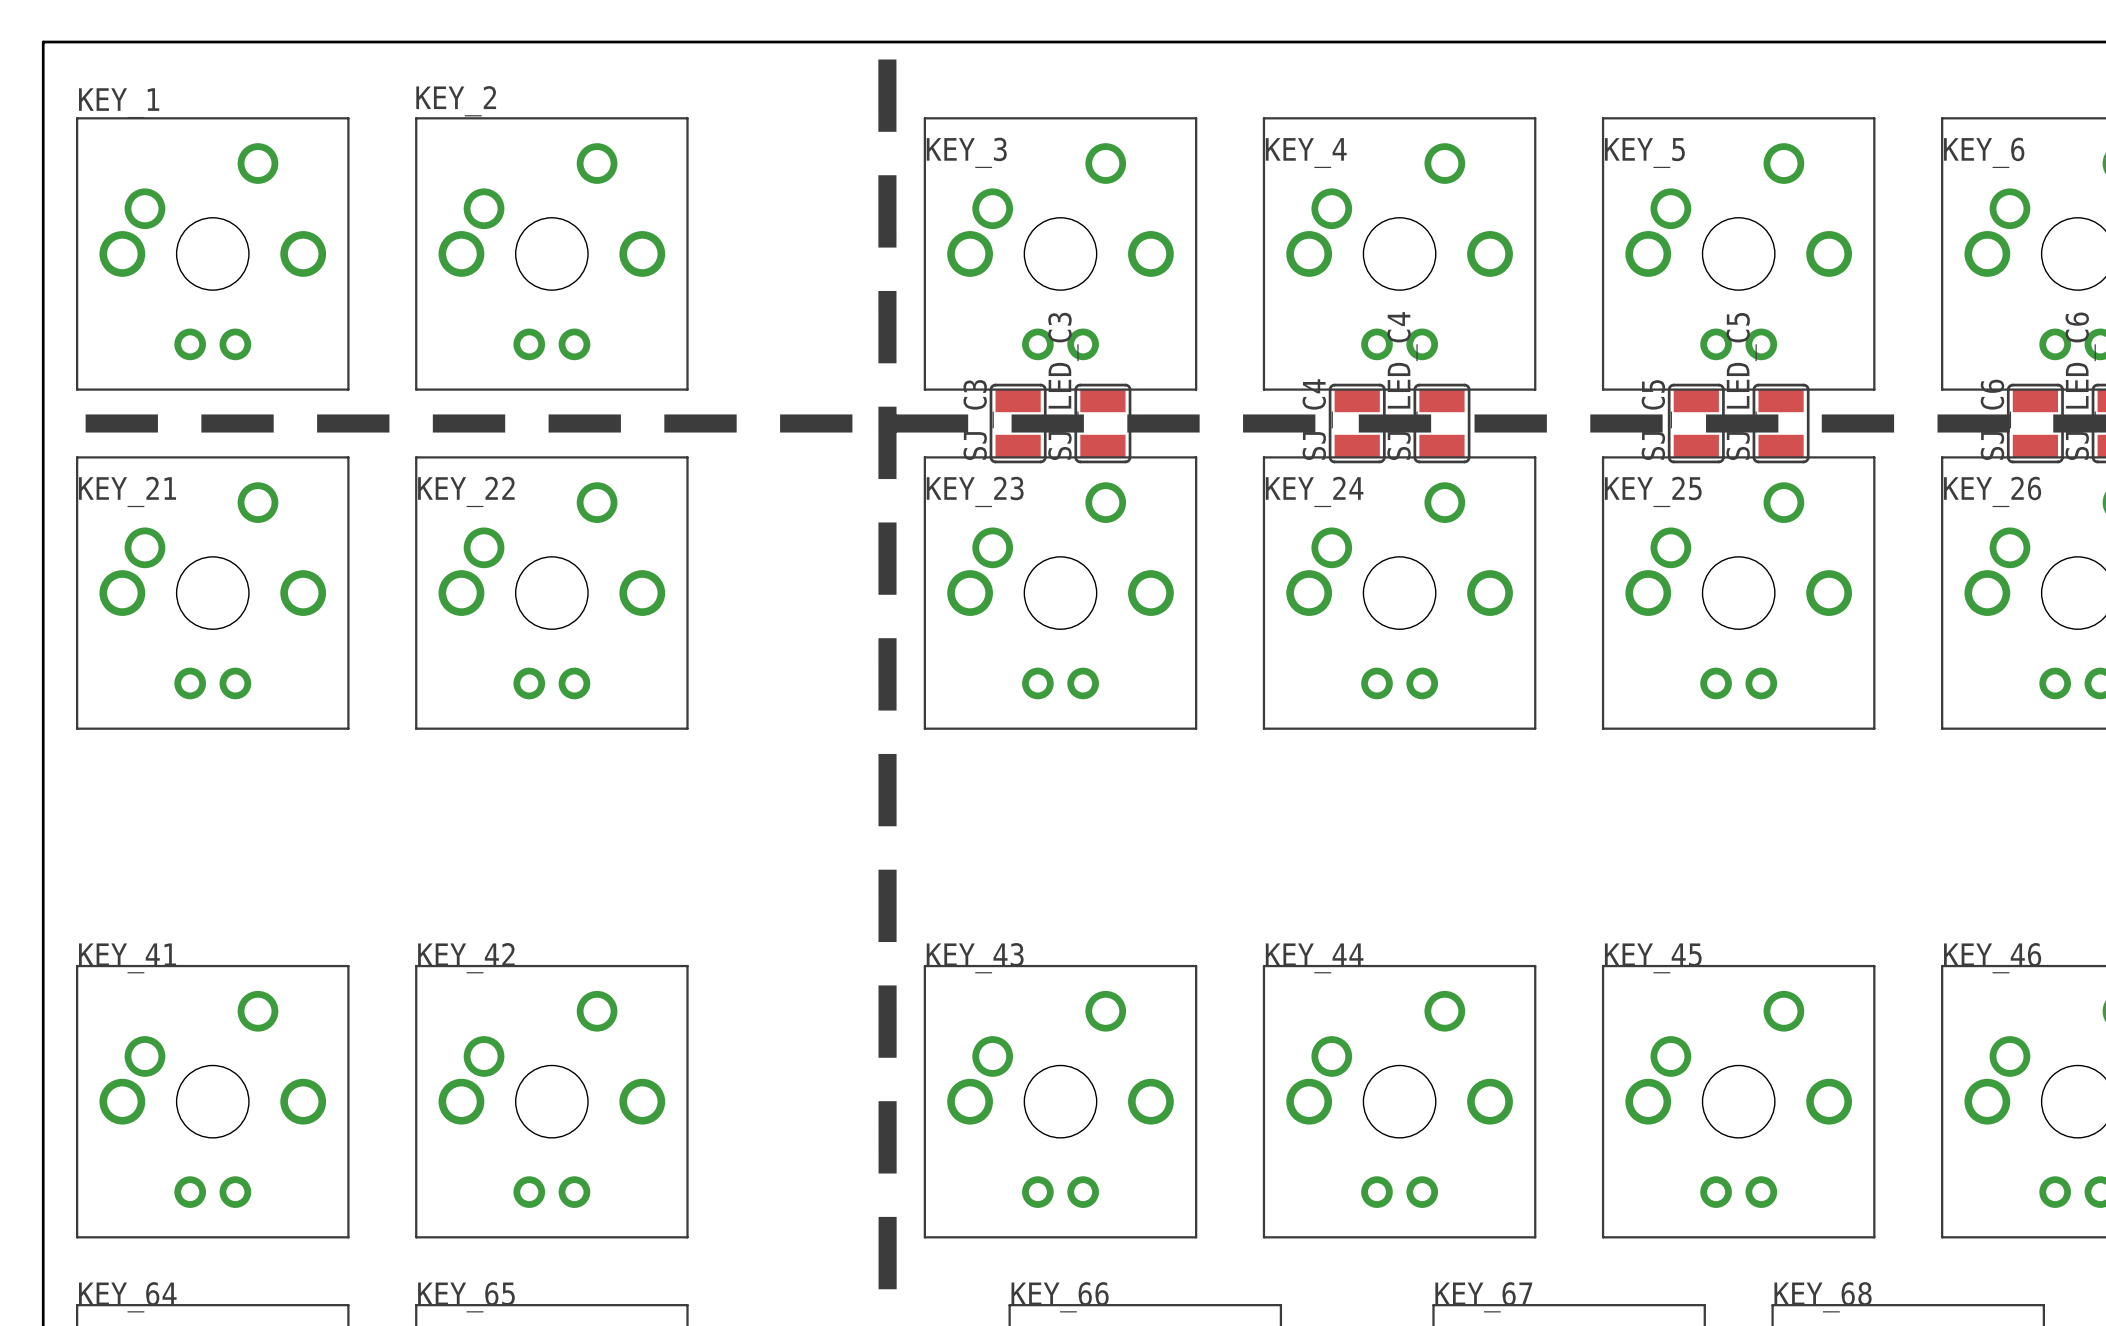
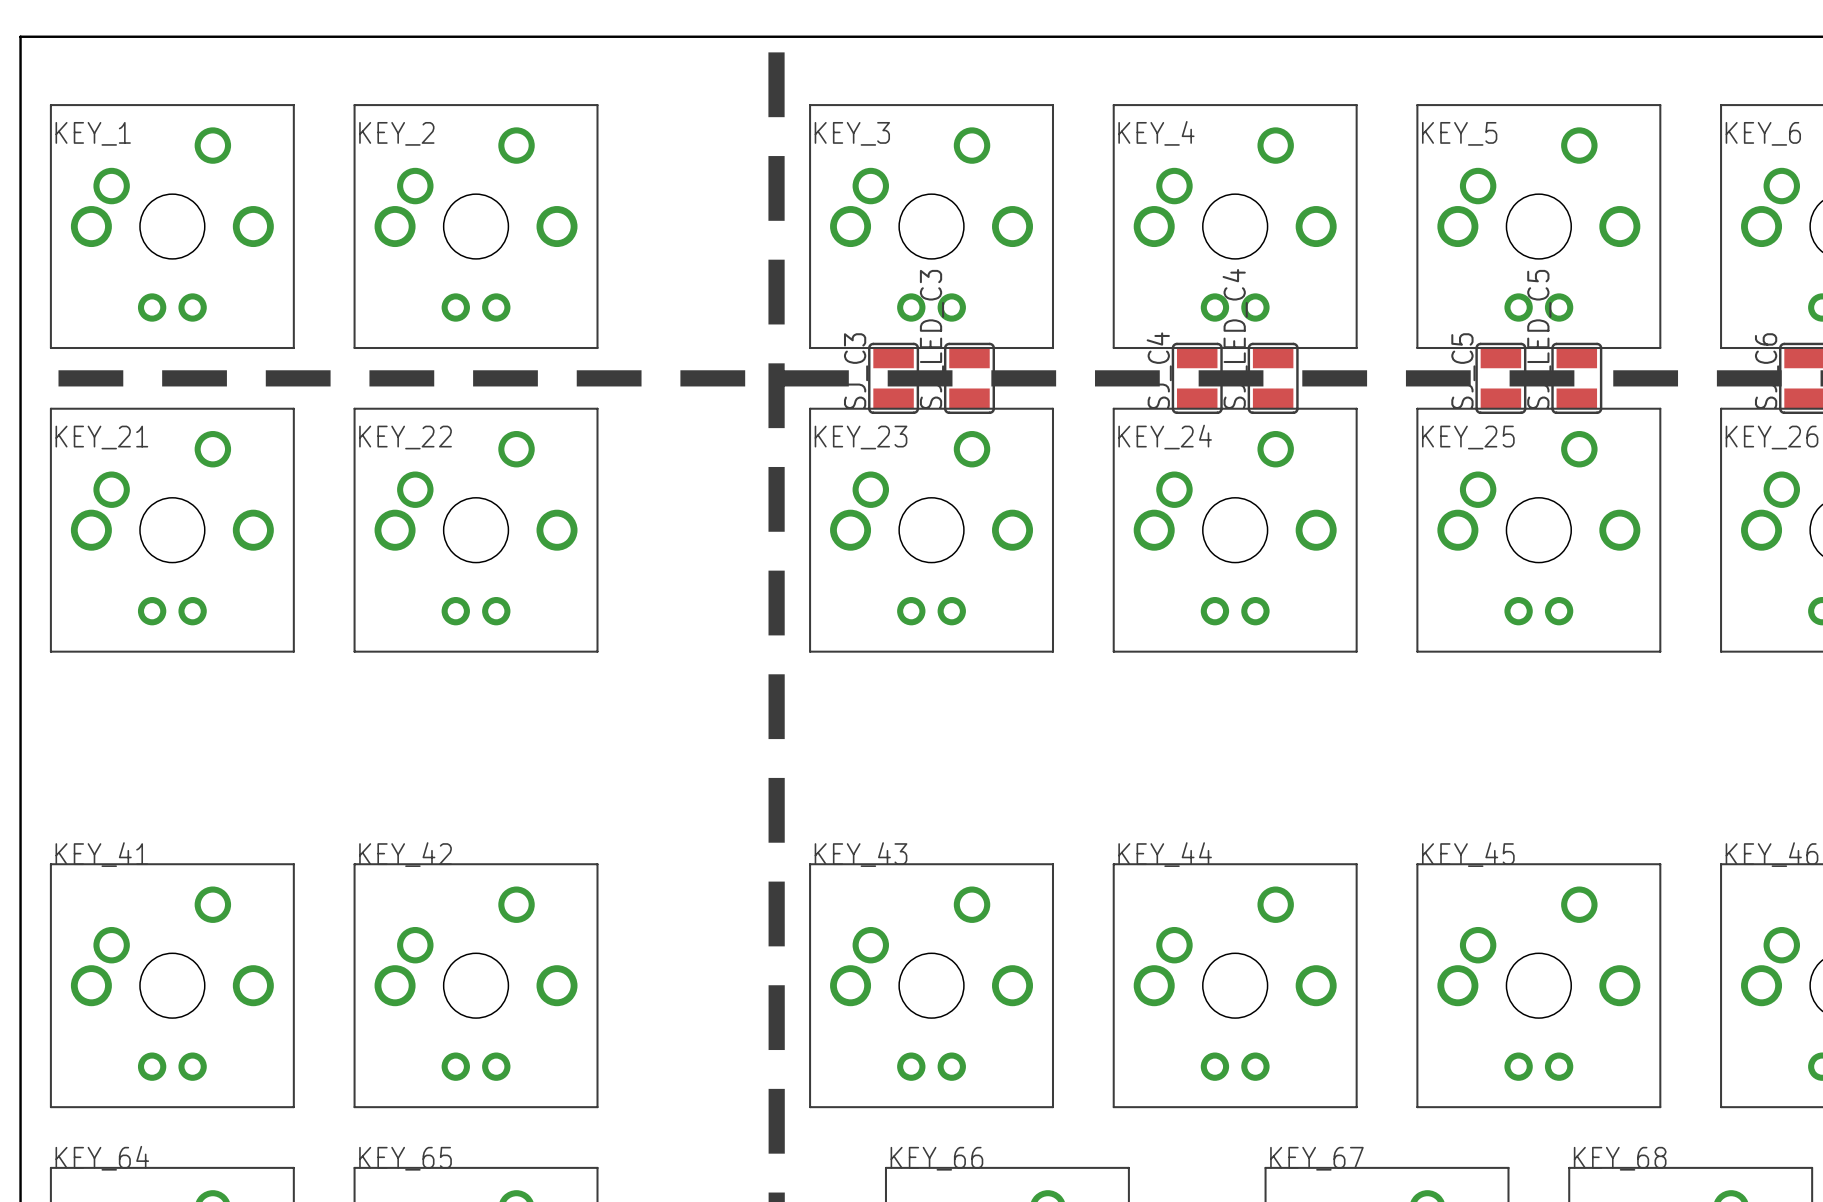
KEY_2 name position: KEY_2 (456, 101) -> KEY_2 (396, 133)
KEY_1 name position: KEY_1 (119, 103) -> KEY_1 (93, 133)

